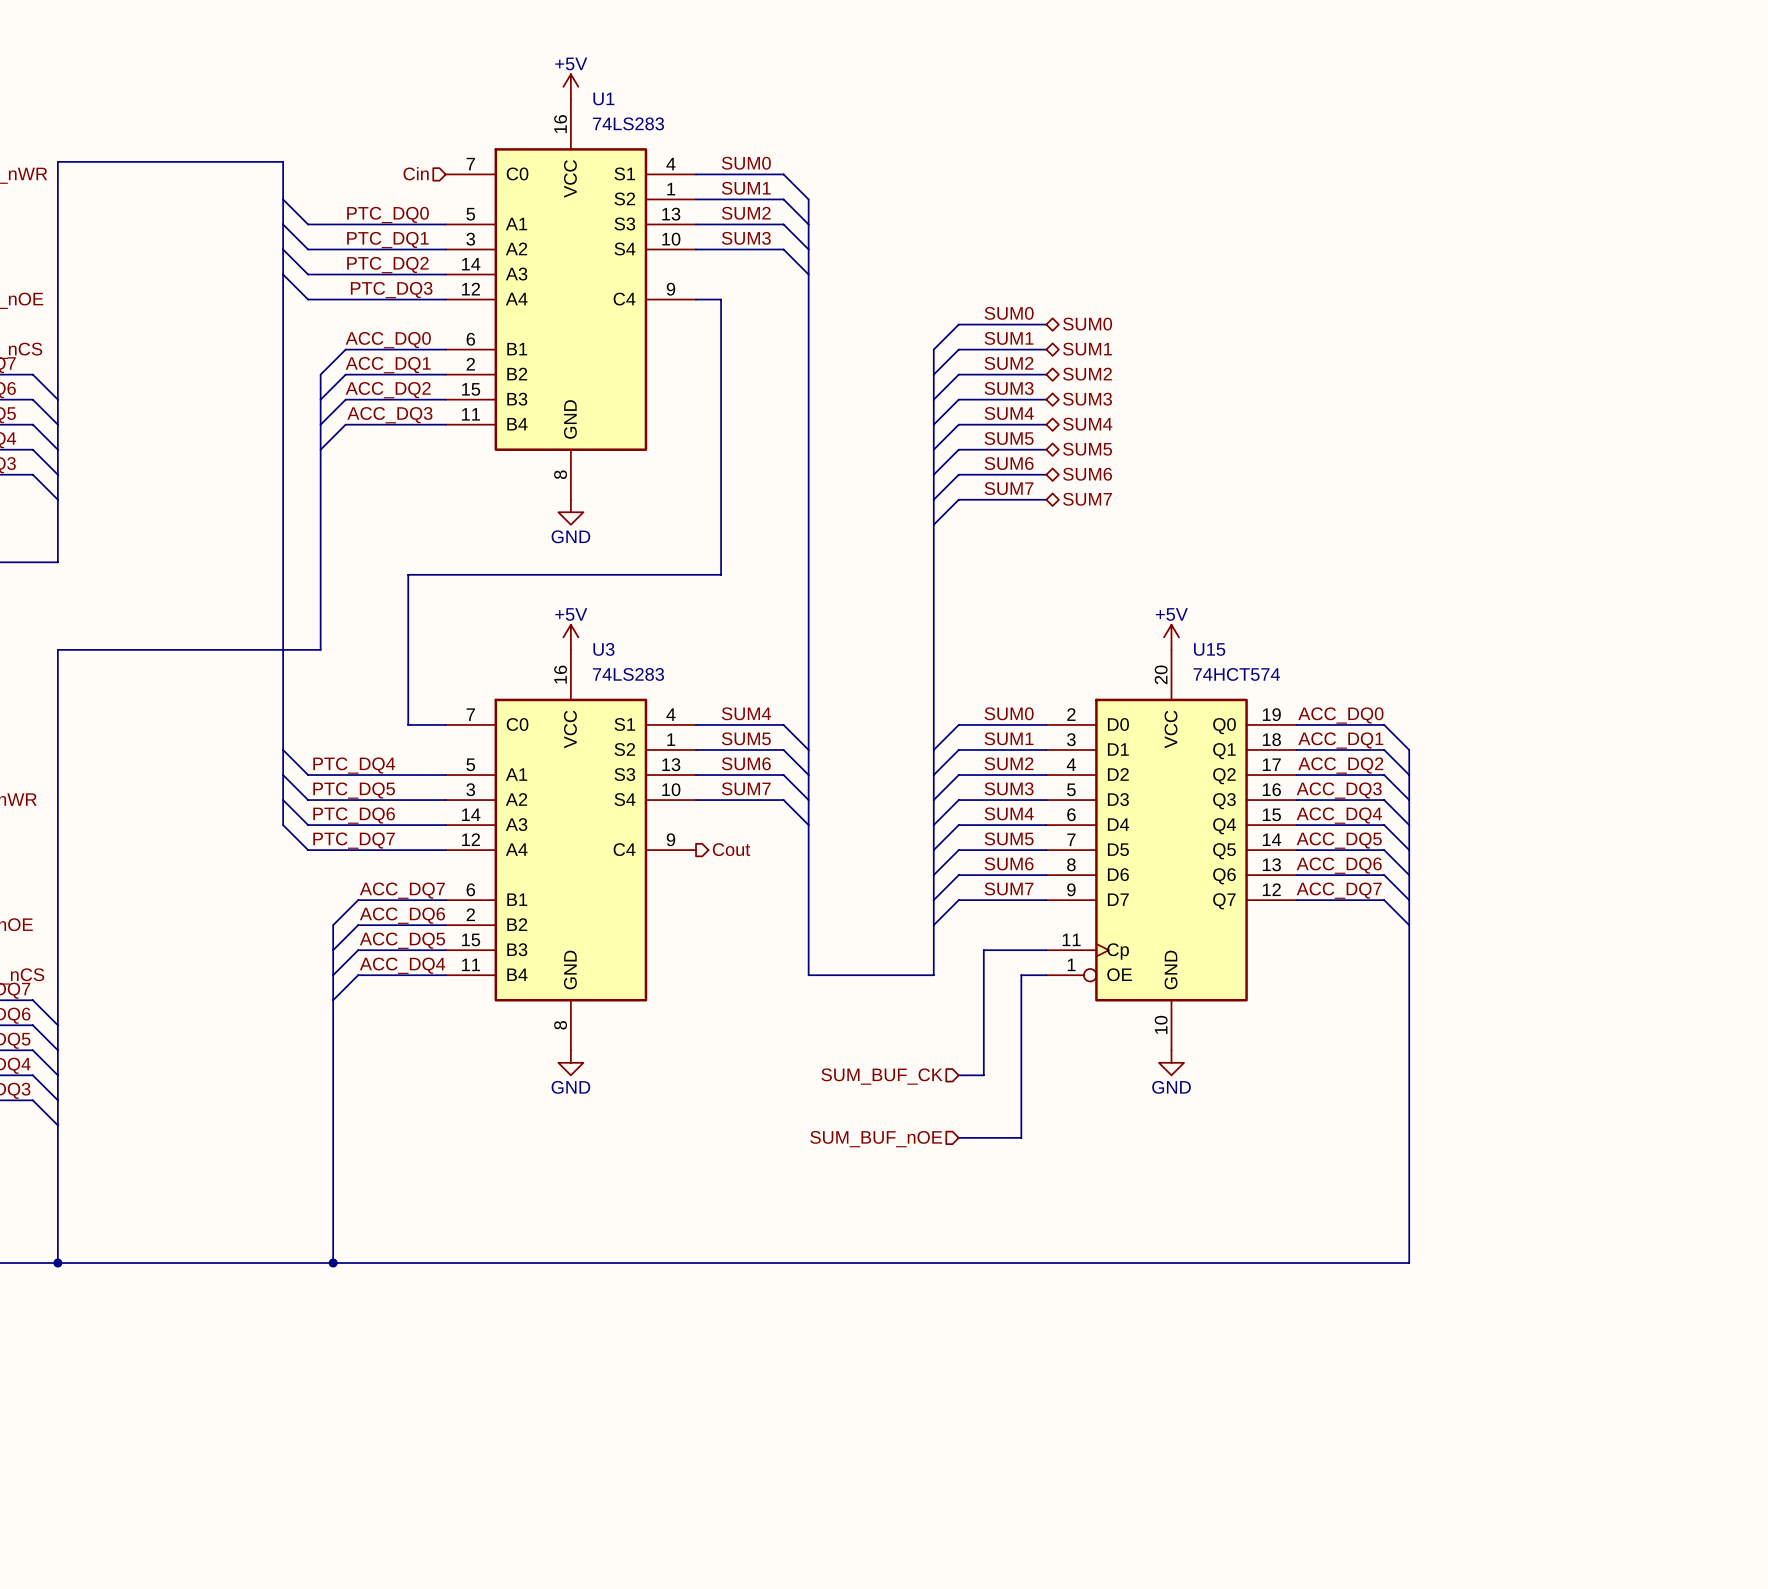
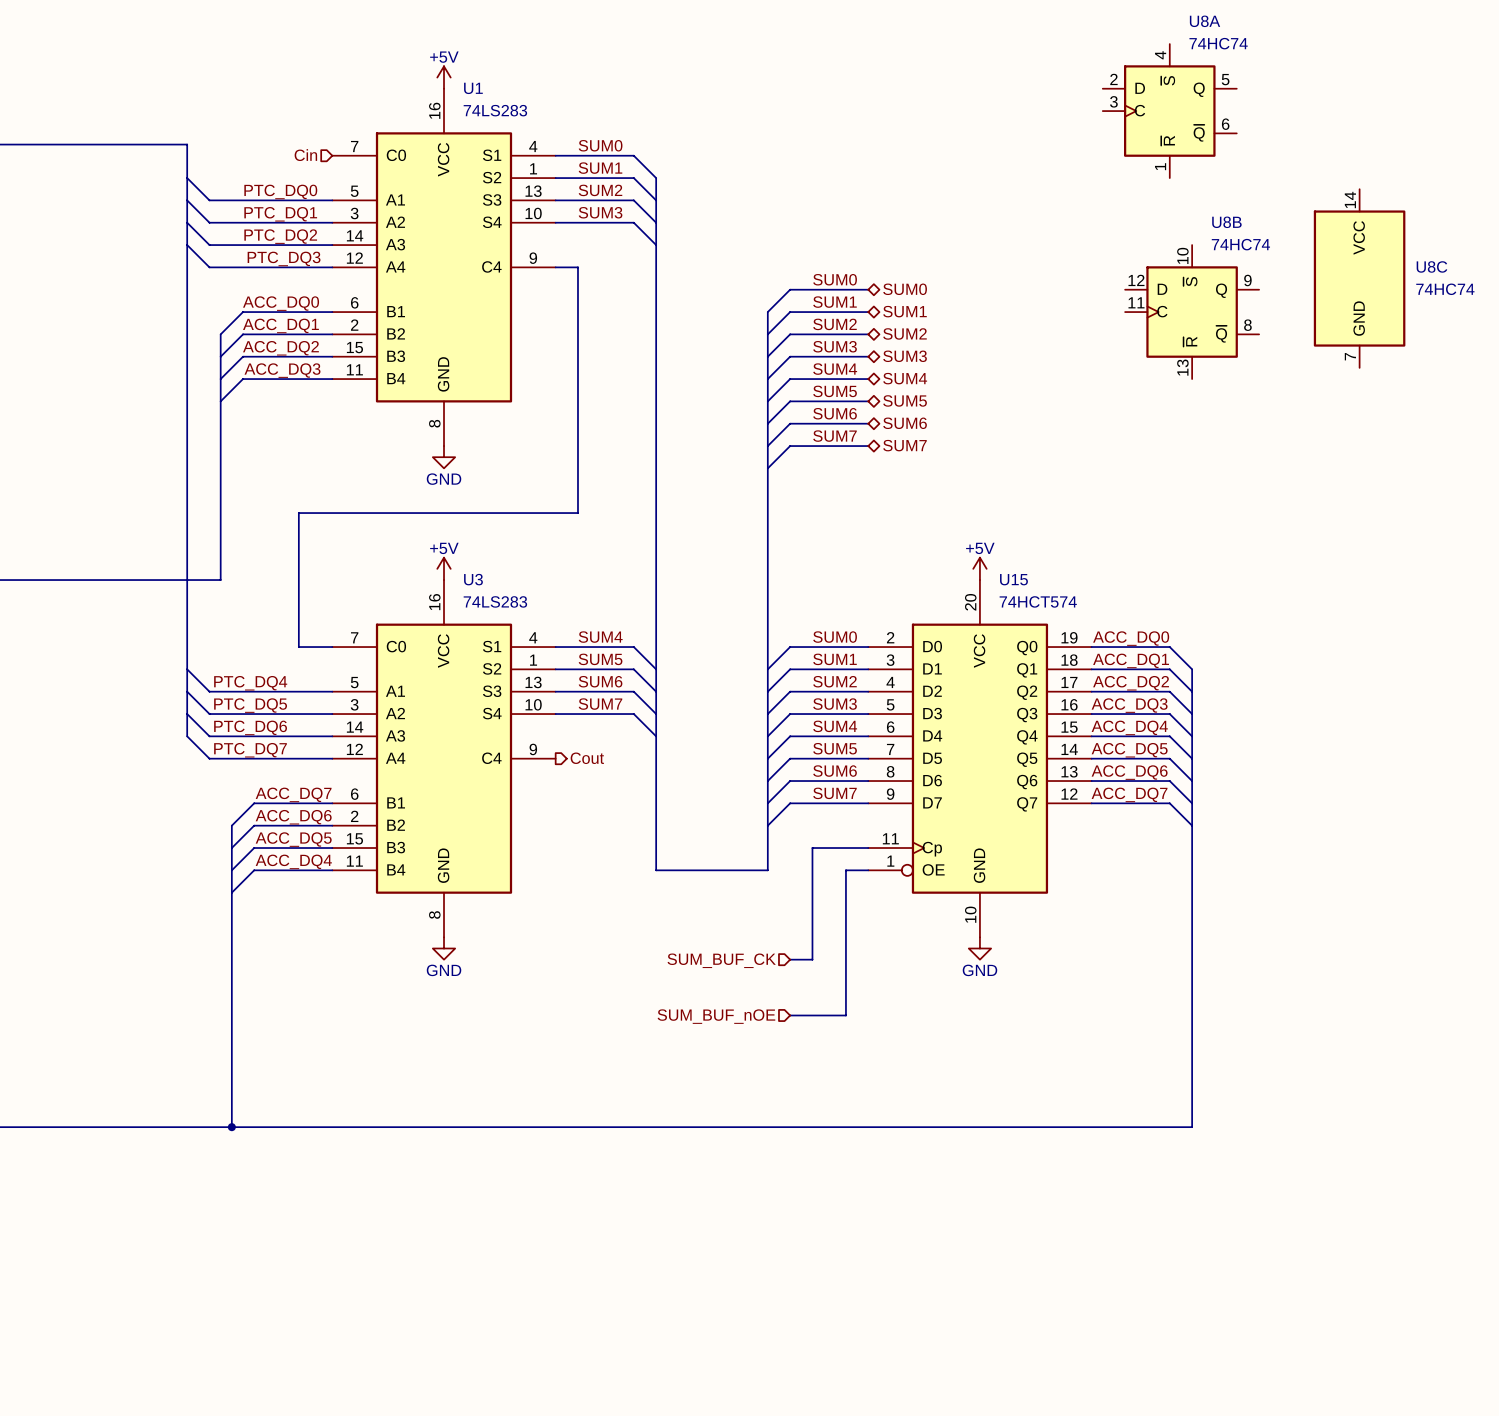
U8A: none -> 74HC74 (1169, 111)
U8C: none -> 74HC74 (1359, 278)
U8B: none -> 74HC74 (1192, 312)

